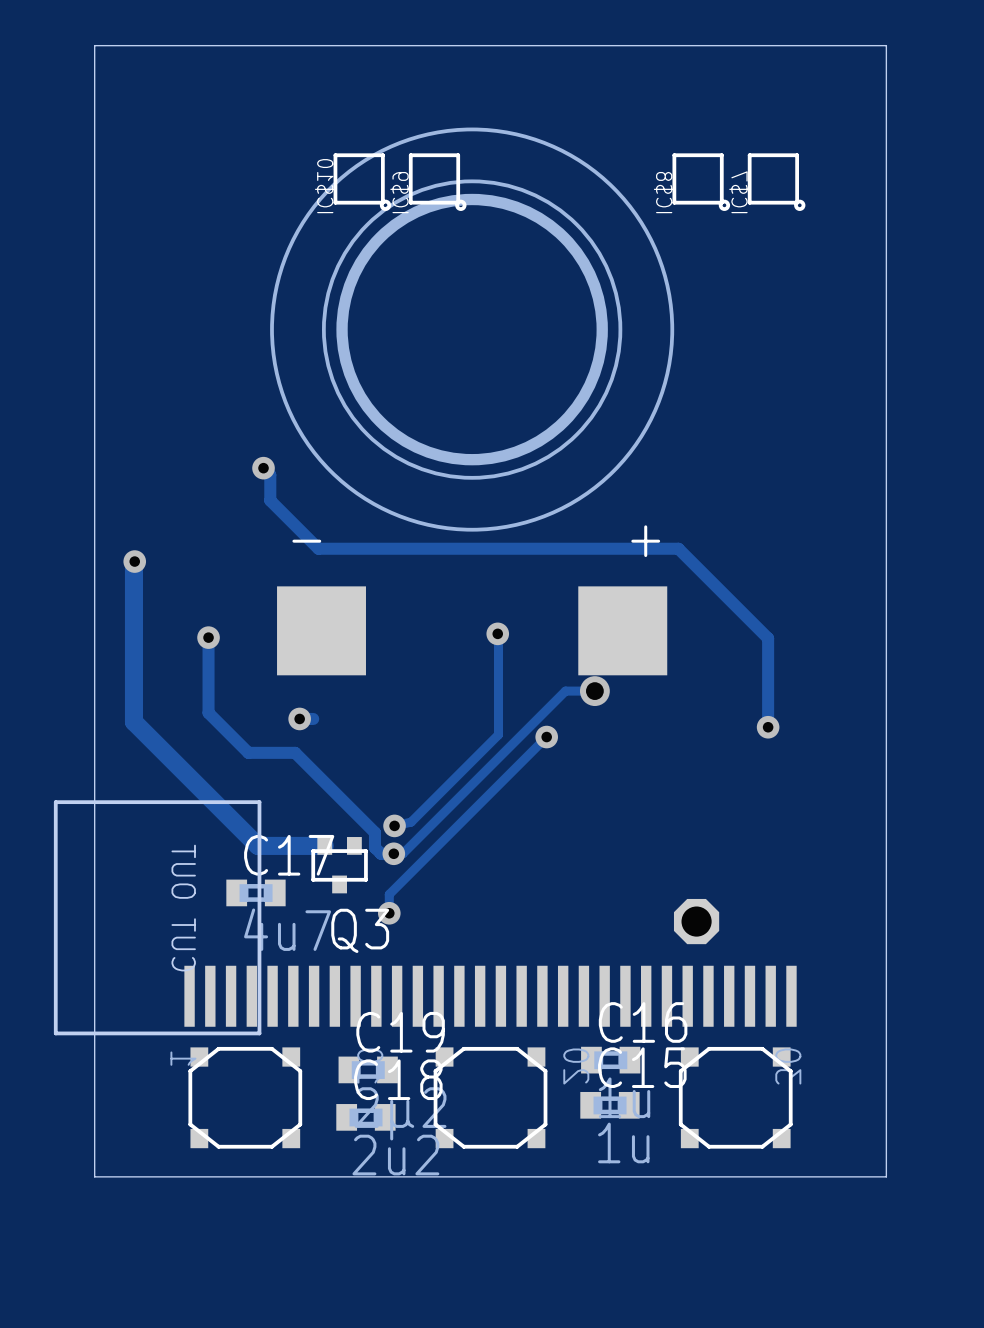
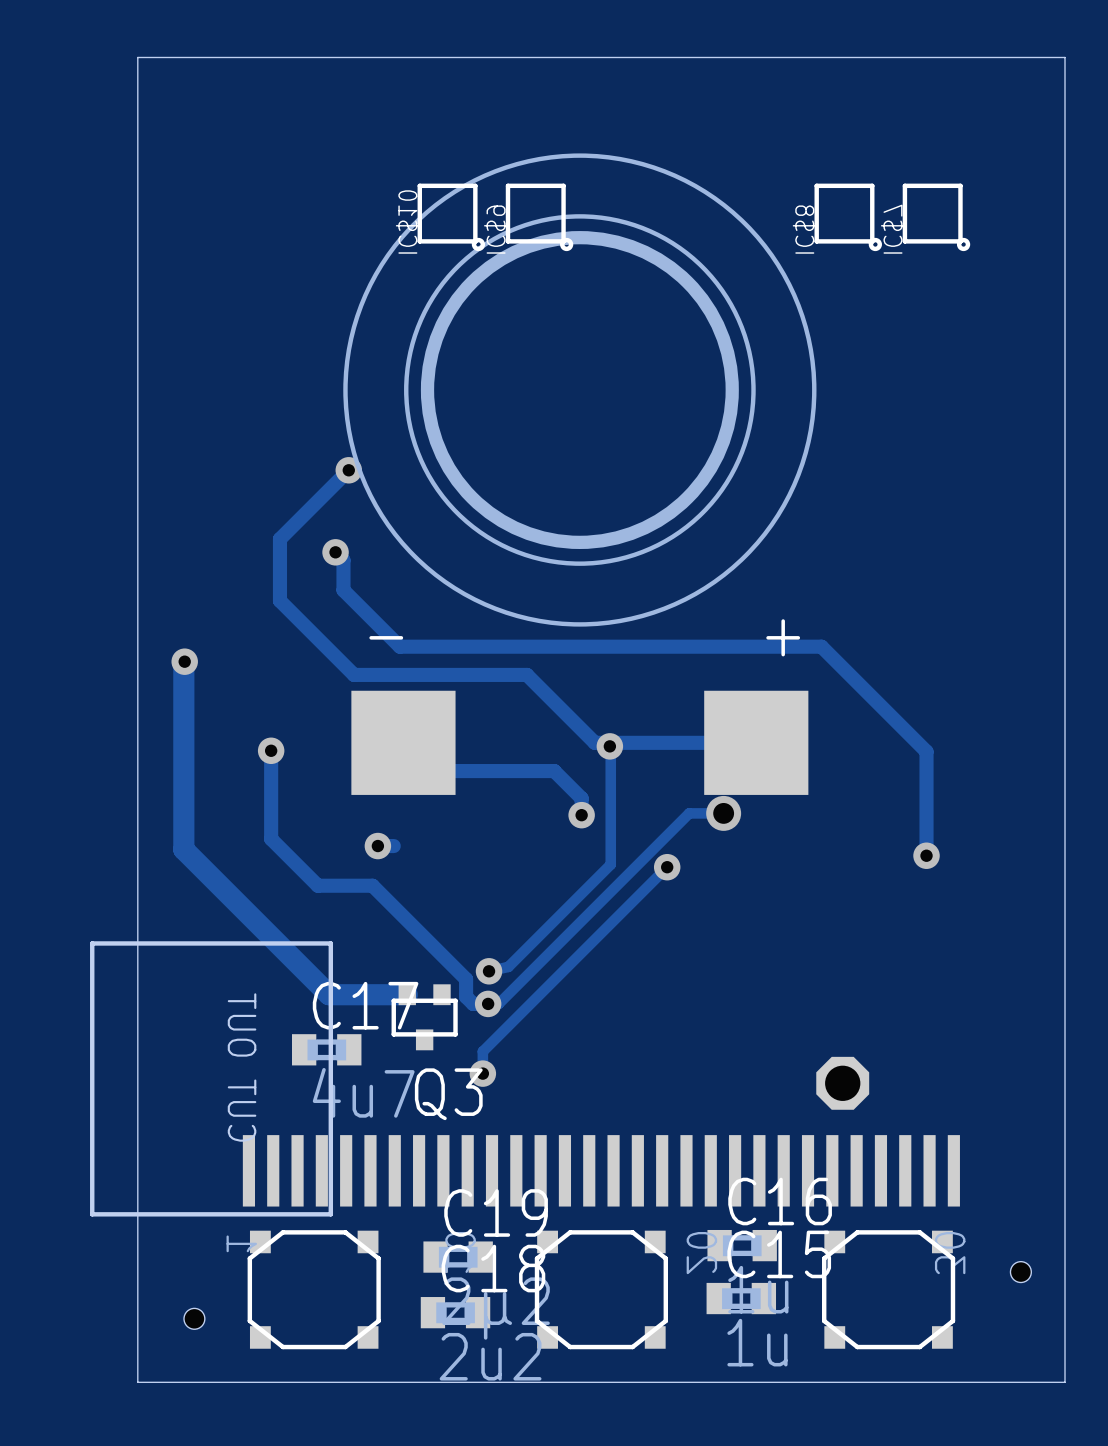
track: none -> (348, 470) (279, 539) (279, 600) (354, 674) (526, 674) (594, 742) (756, 742)
via: none -> (348, 470)
track: none -> (403, 742) (431, 771) (554, 771) (581, 798) (581, 815)
via: none -> (581, 815)
hole: none -> (1020, 1272)
hole: none -> (194, 1318)

